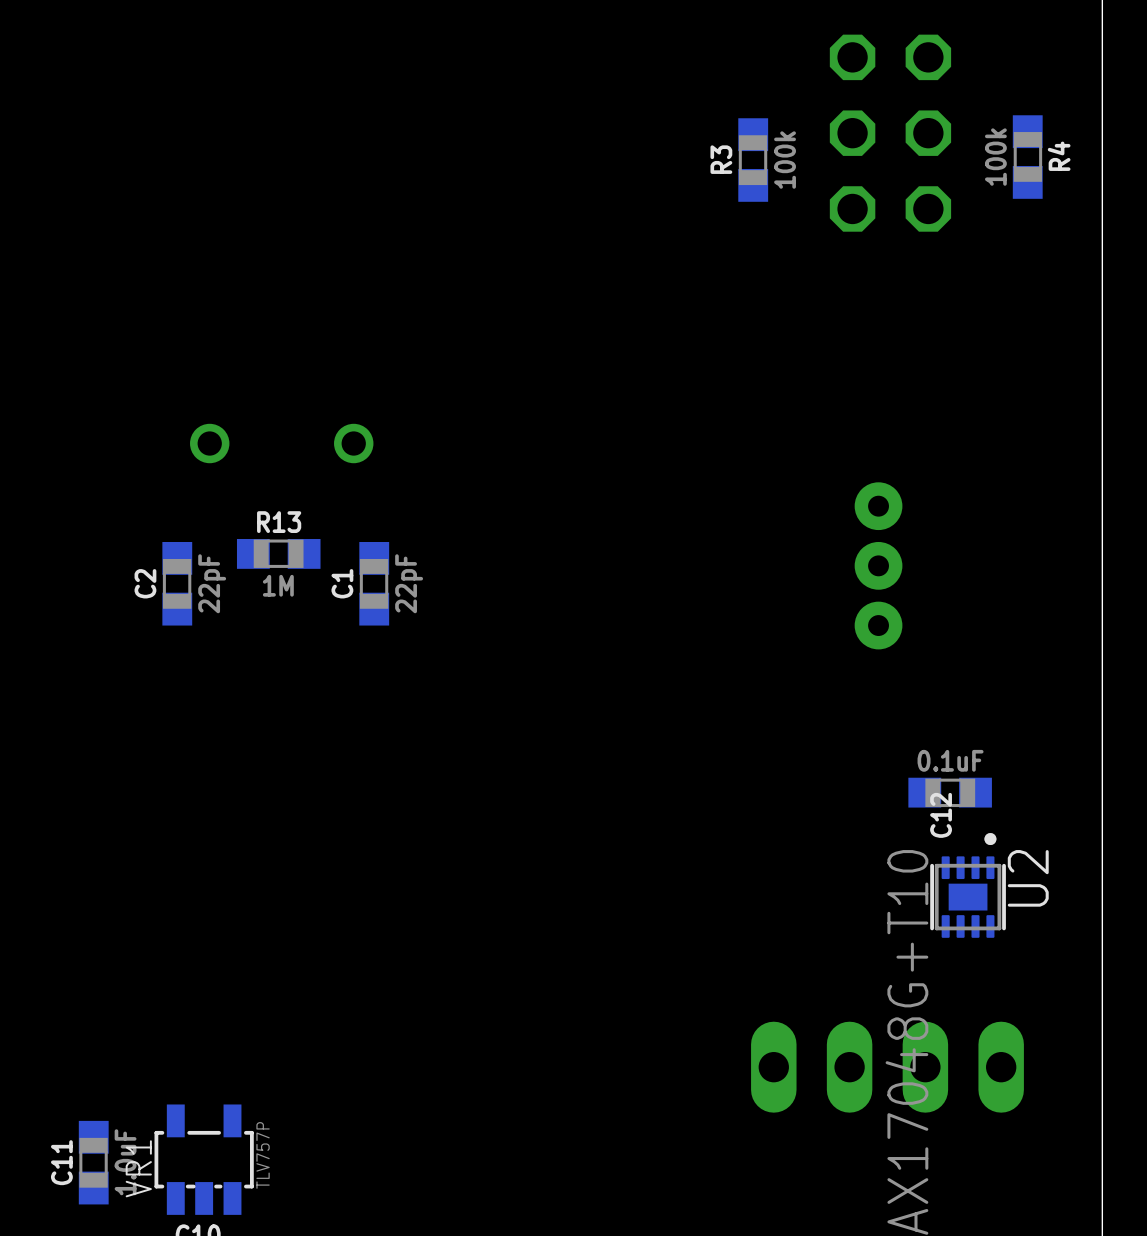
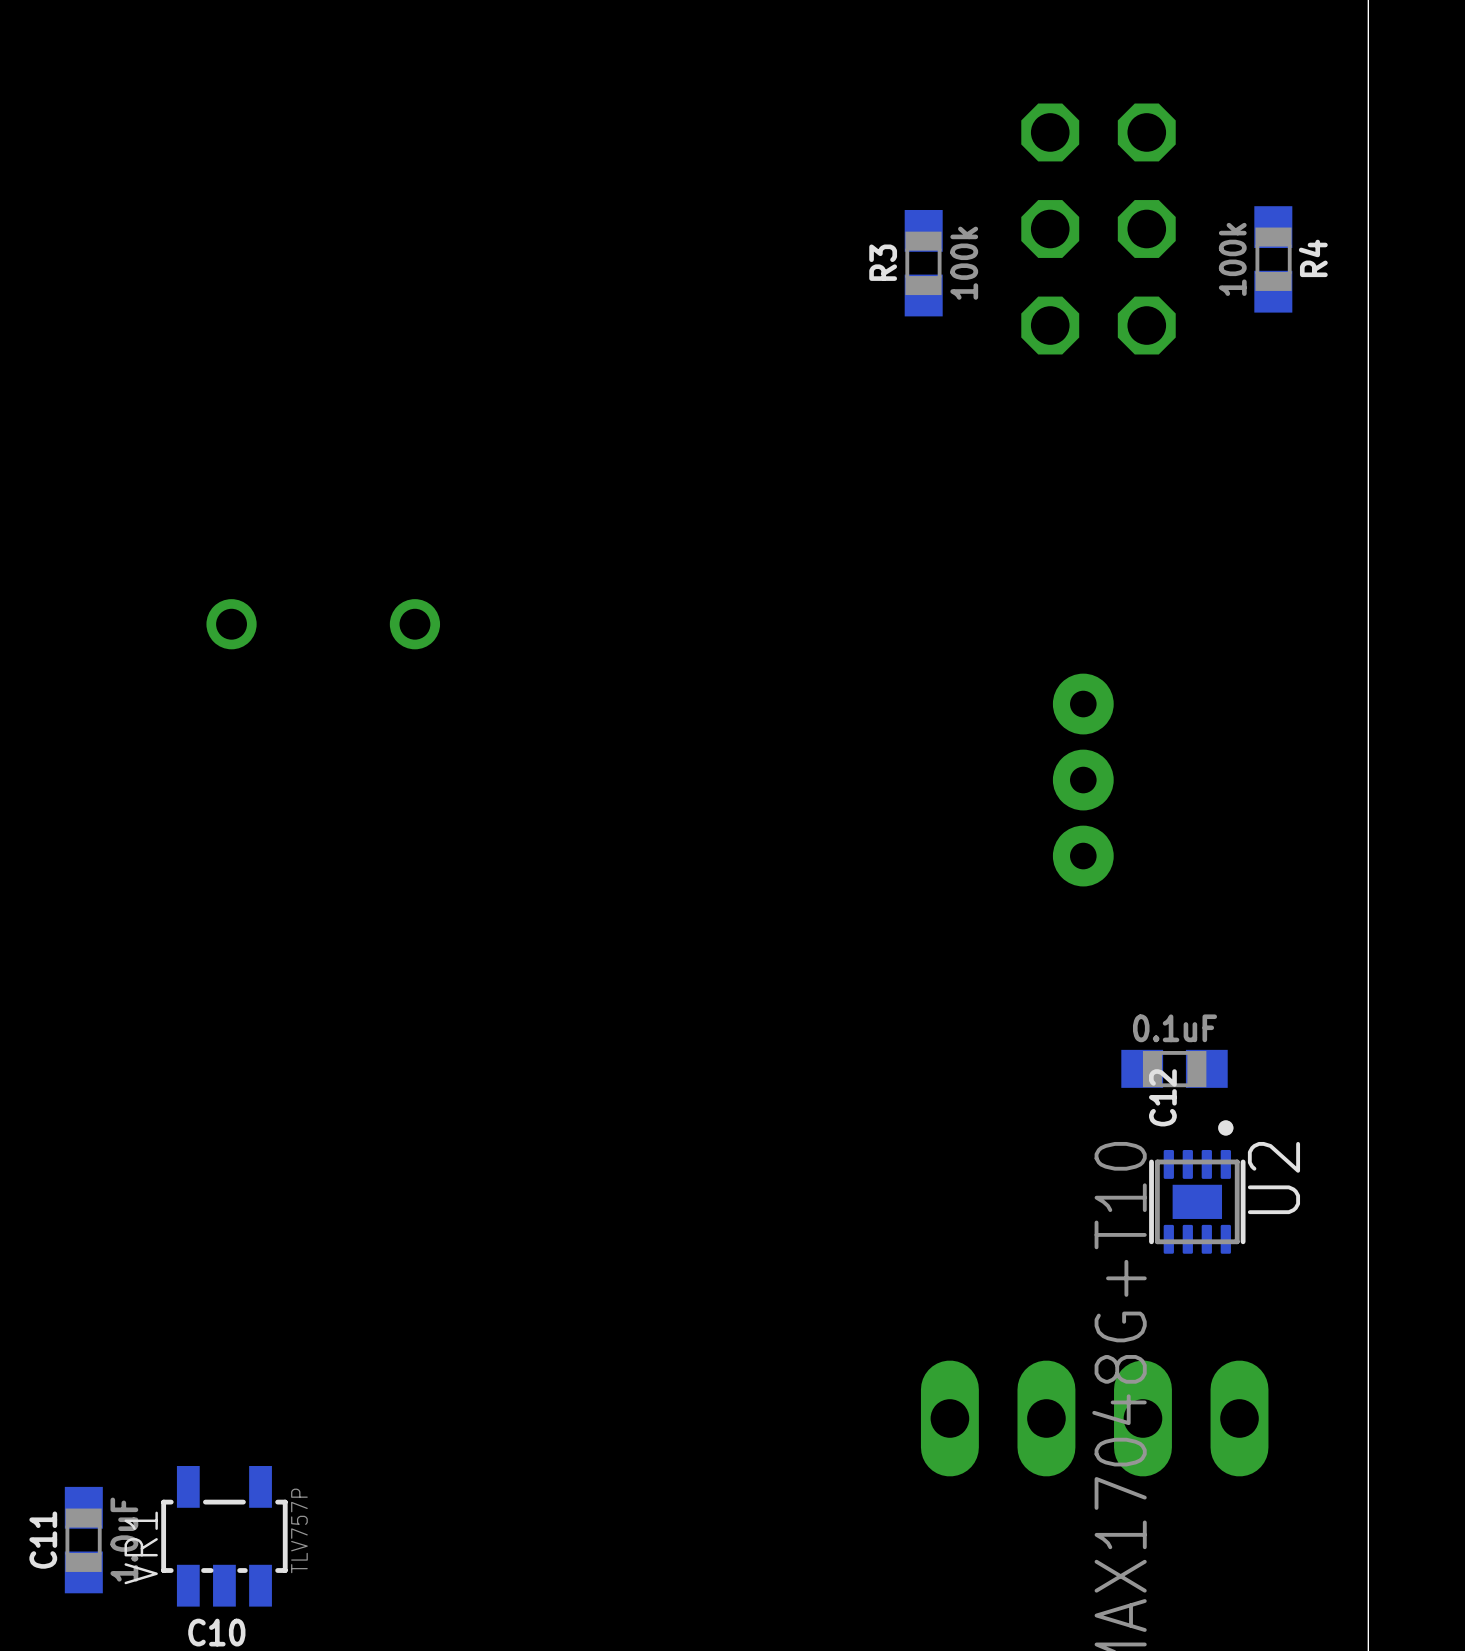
R13: 1M (278, 553) -> none
C2: 22pF (177, 583) -> none
C1: 22pF (374, 583) -> none

